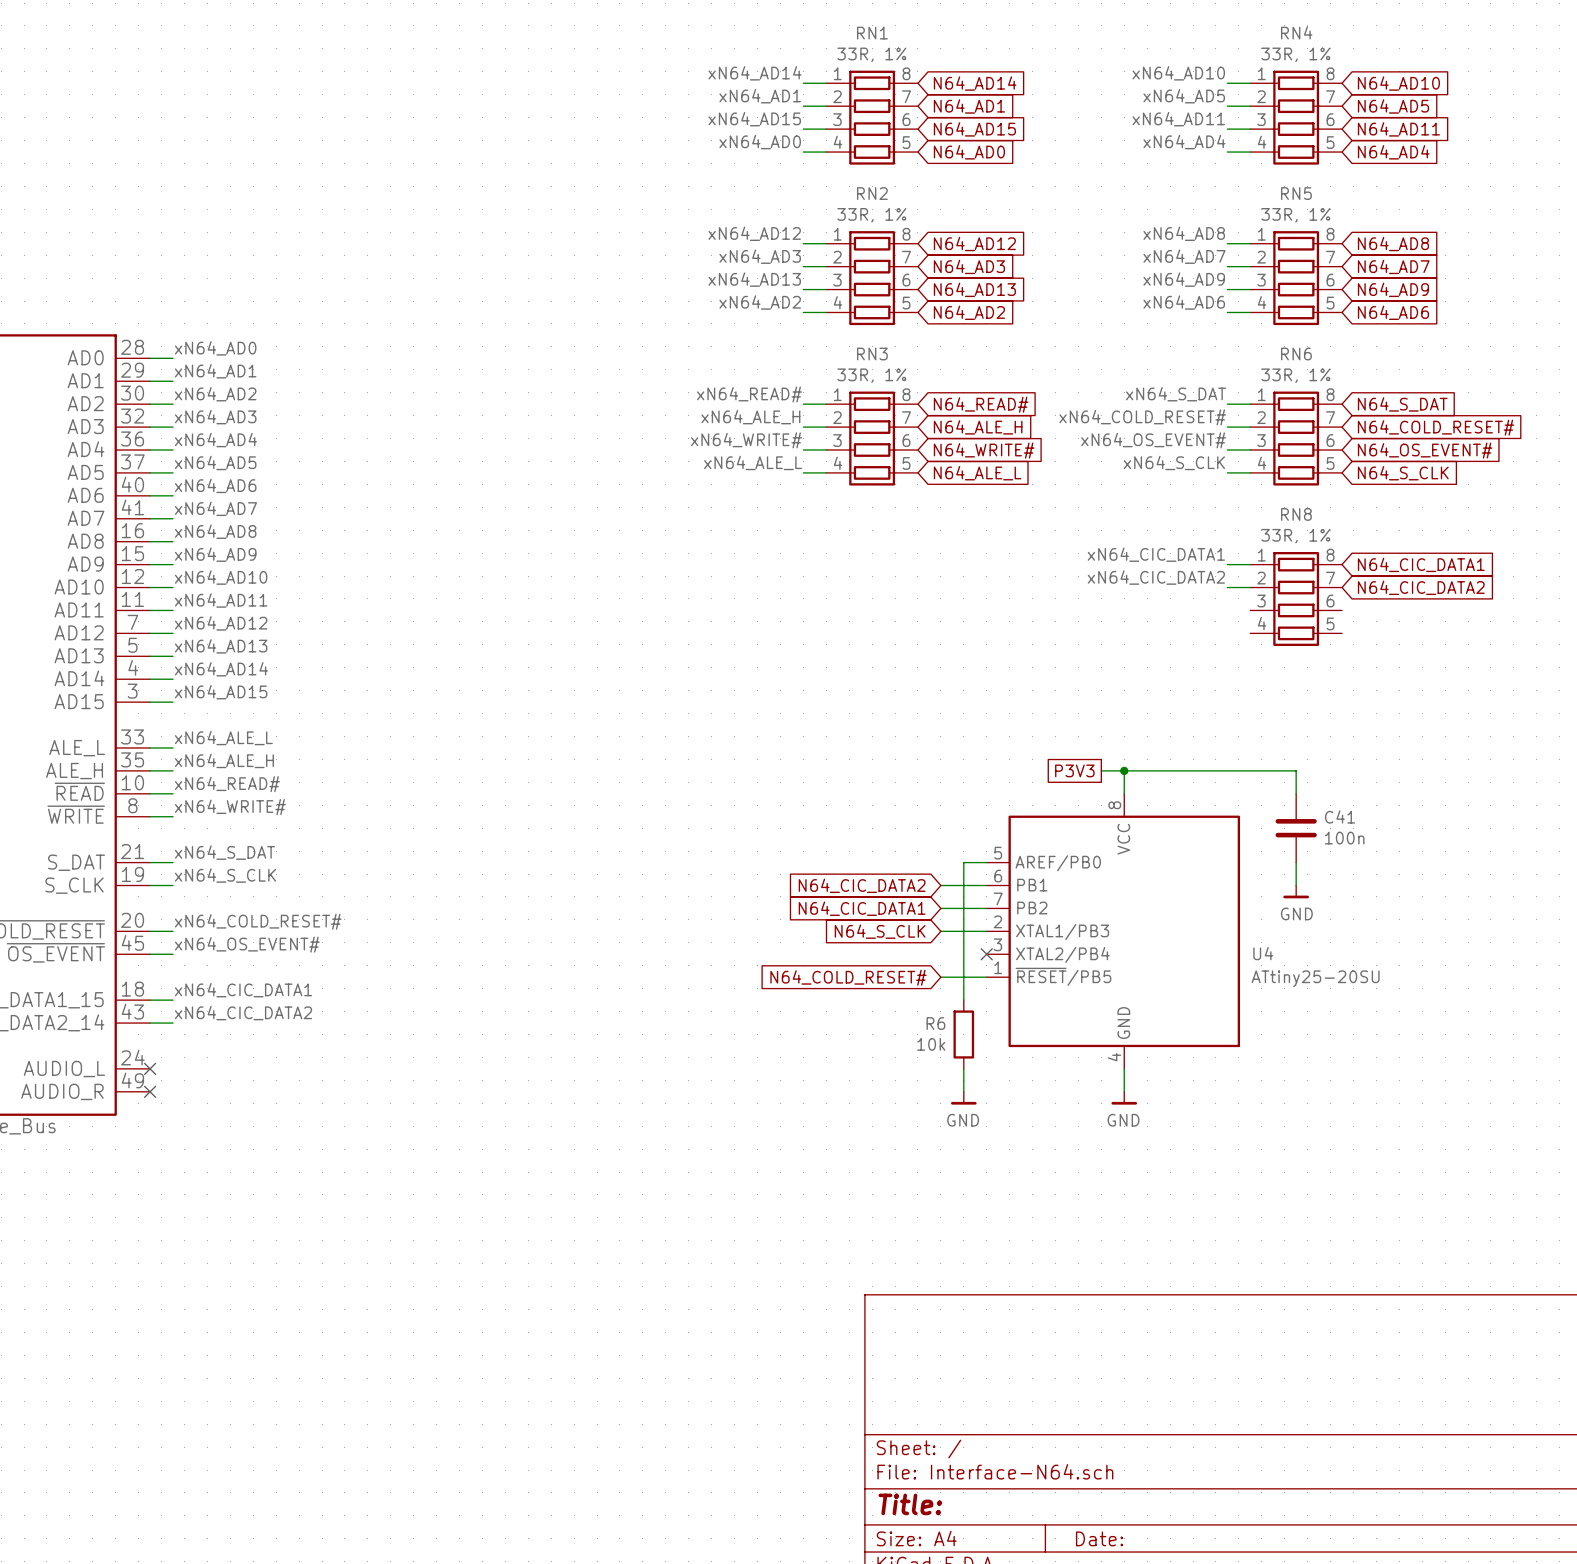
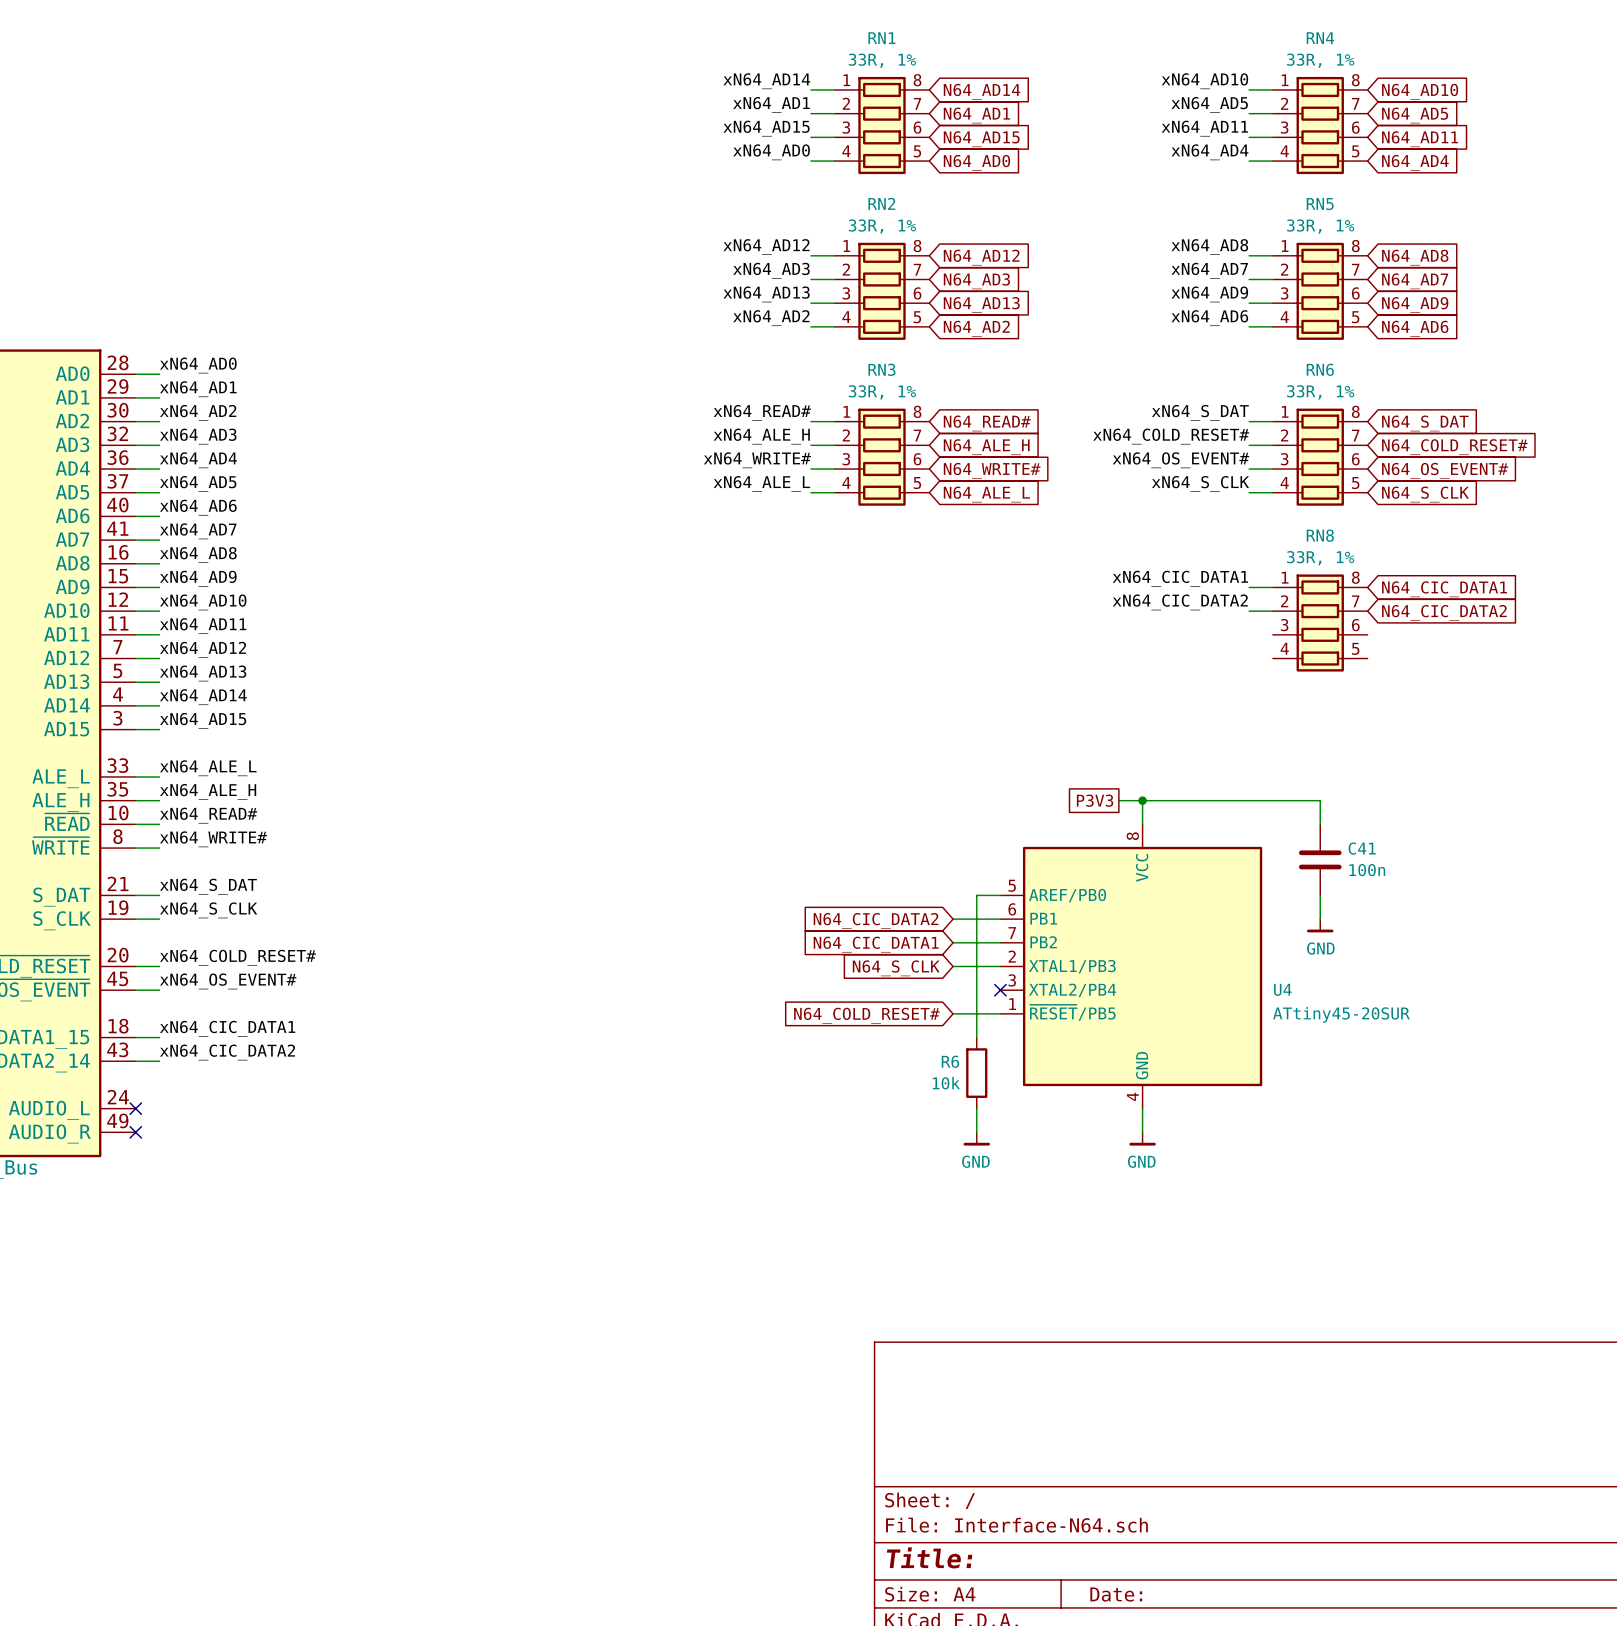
U4 value: ATtiny25-20SU (1315, 978) -> ATtiny45-20SUR (1341, 1014)

